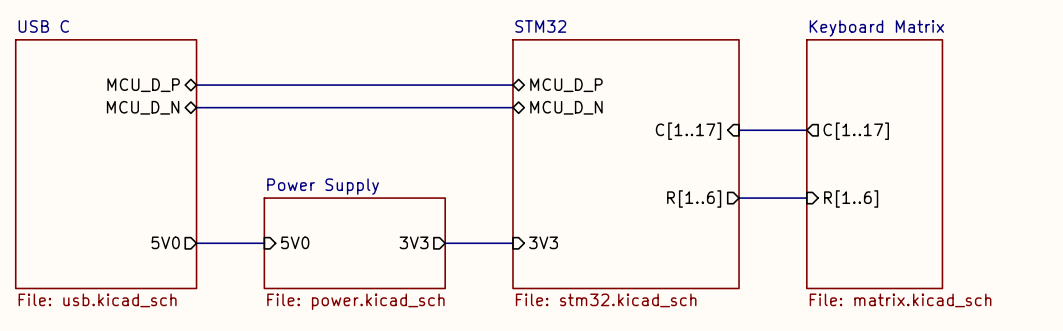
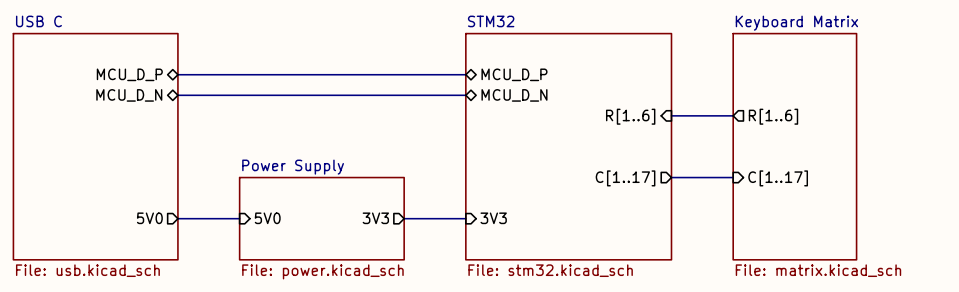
sheet pin: C[1..17] (688, 131) -> R[1..6] (630, 116)
sheet pin: C[1..17] (856, 131) -> R[1..6] (773, 116)
sheet pin: R[1..6] (694, 198) -> C[1..17] (625, 178)
sheet pin: R[1..6] (851, 198) -> C[1..17] (778, 178)

